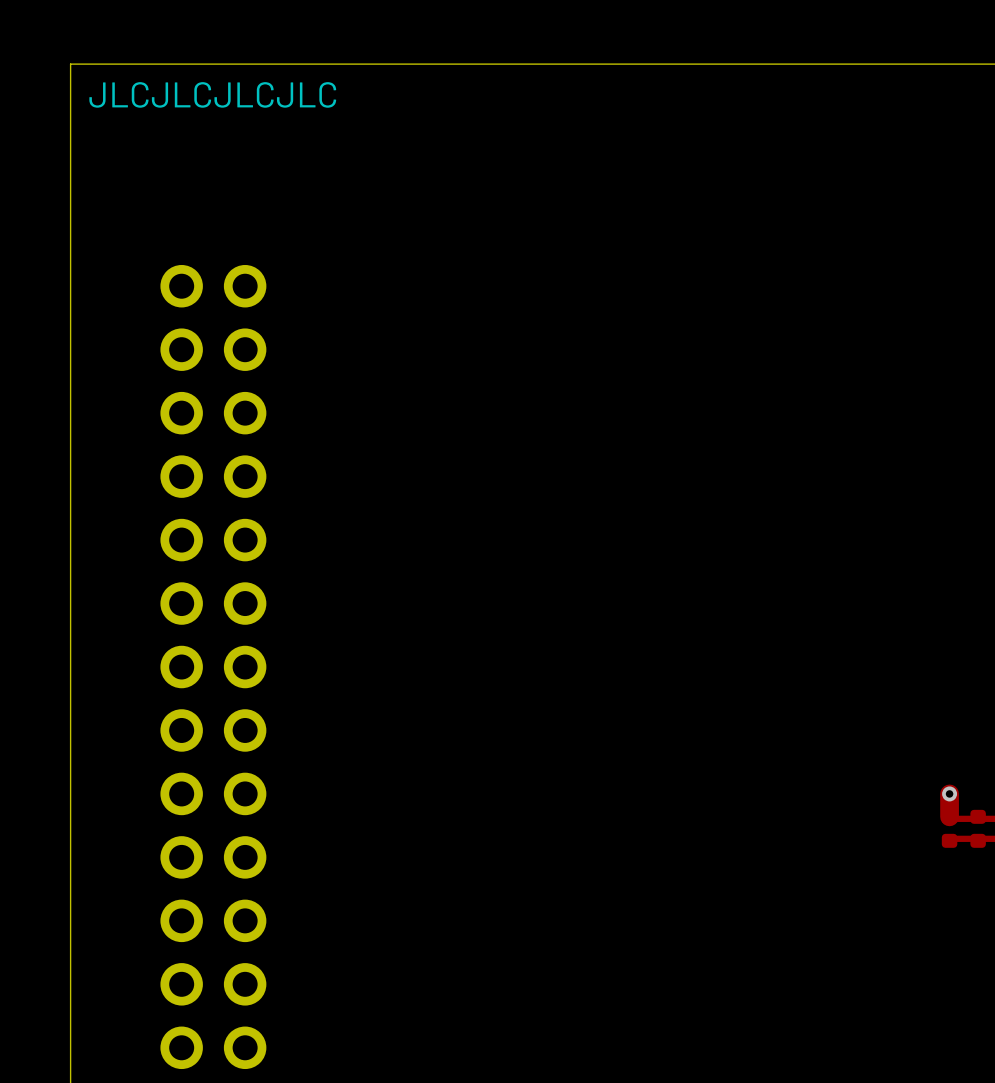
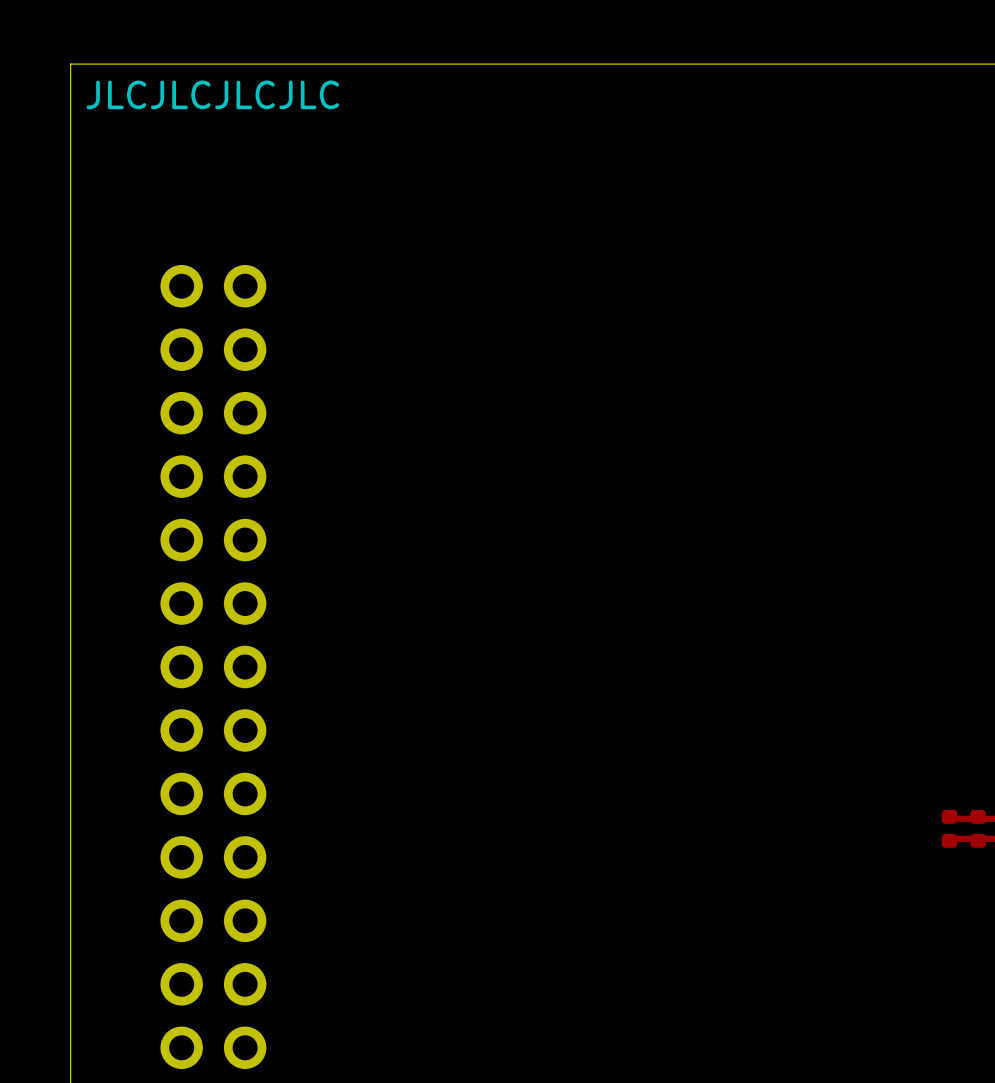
top track: (949, 793) (949, 816) -> none
via: (949, 793) -> none

